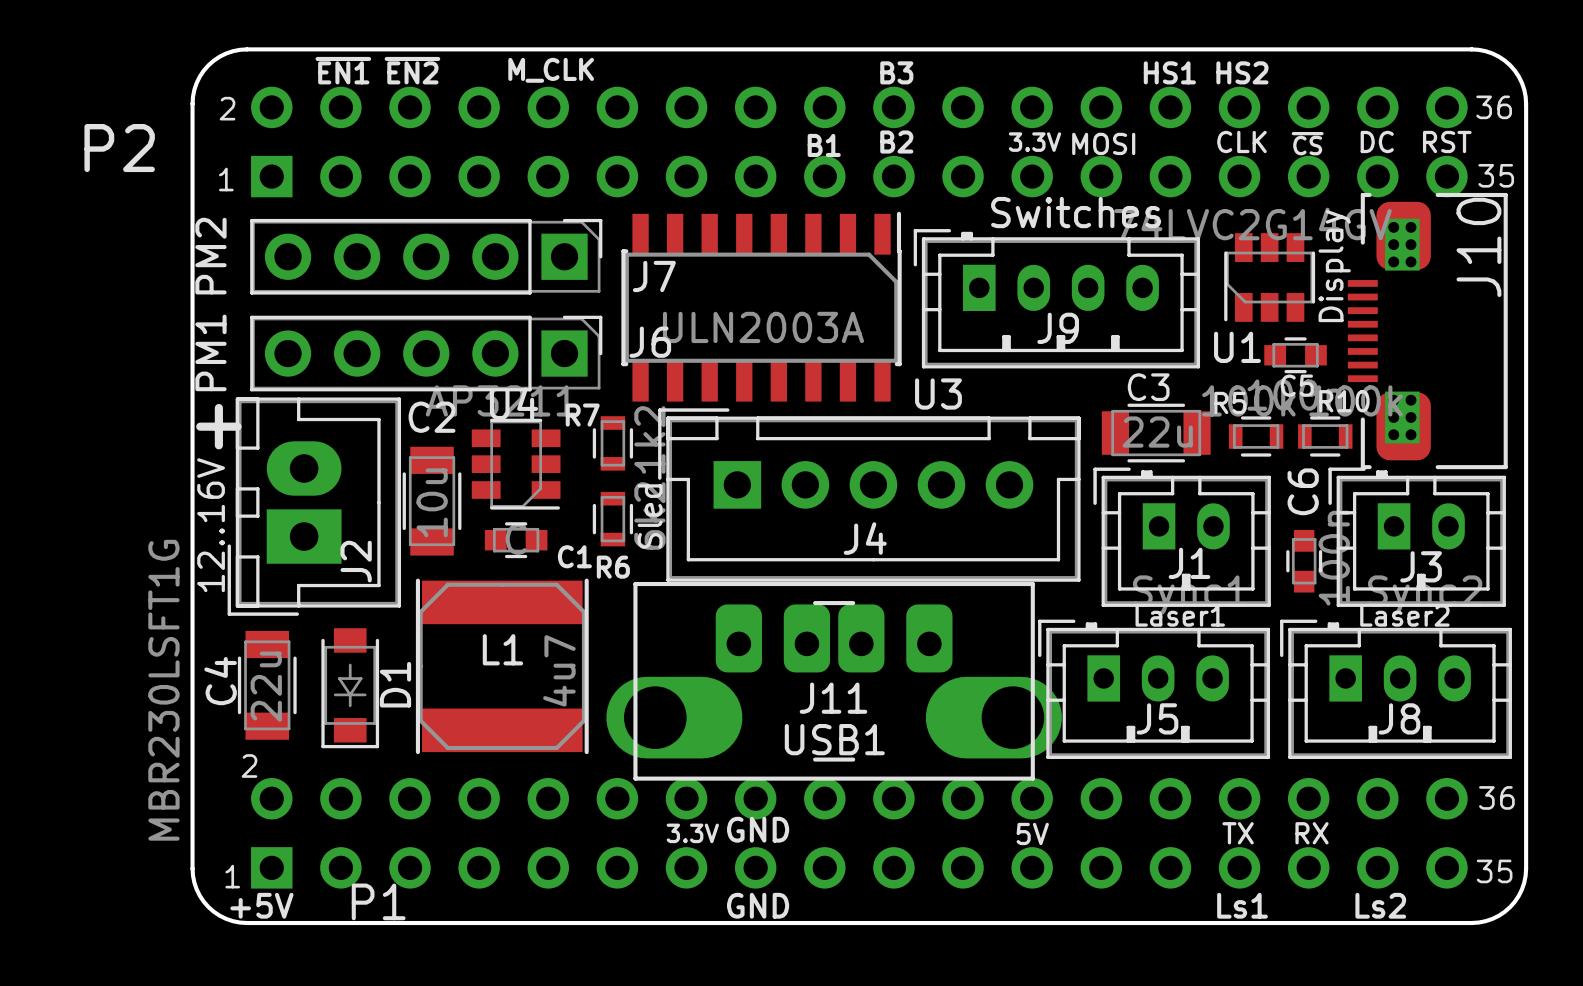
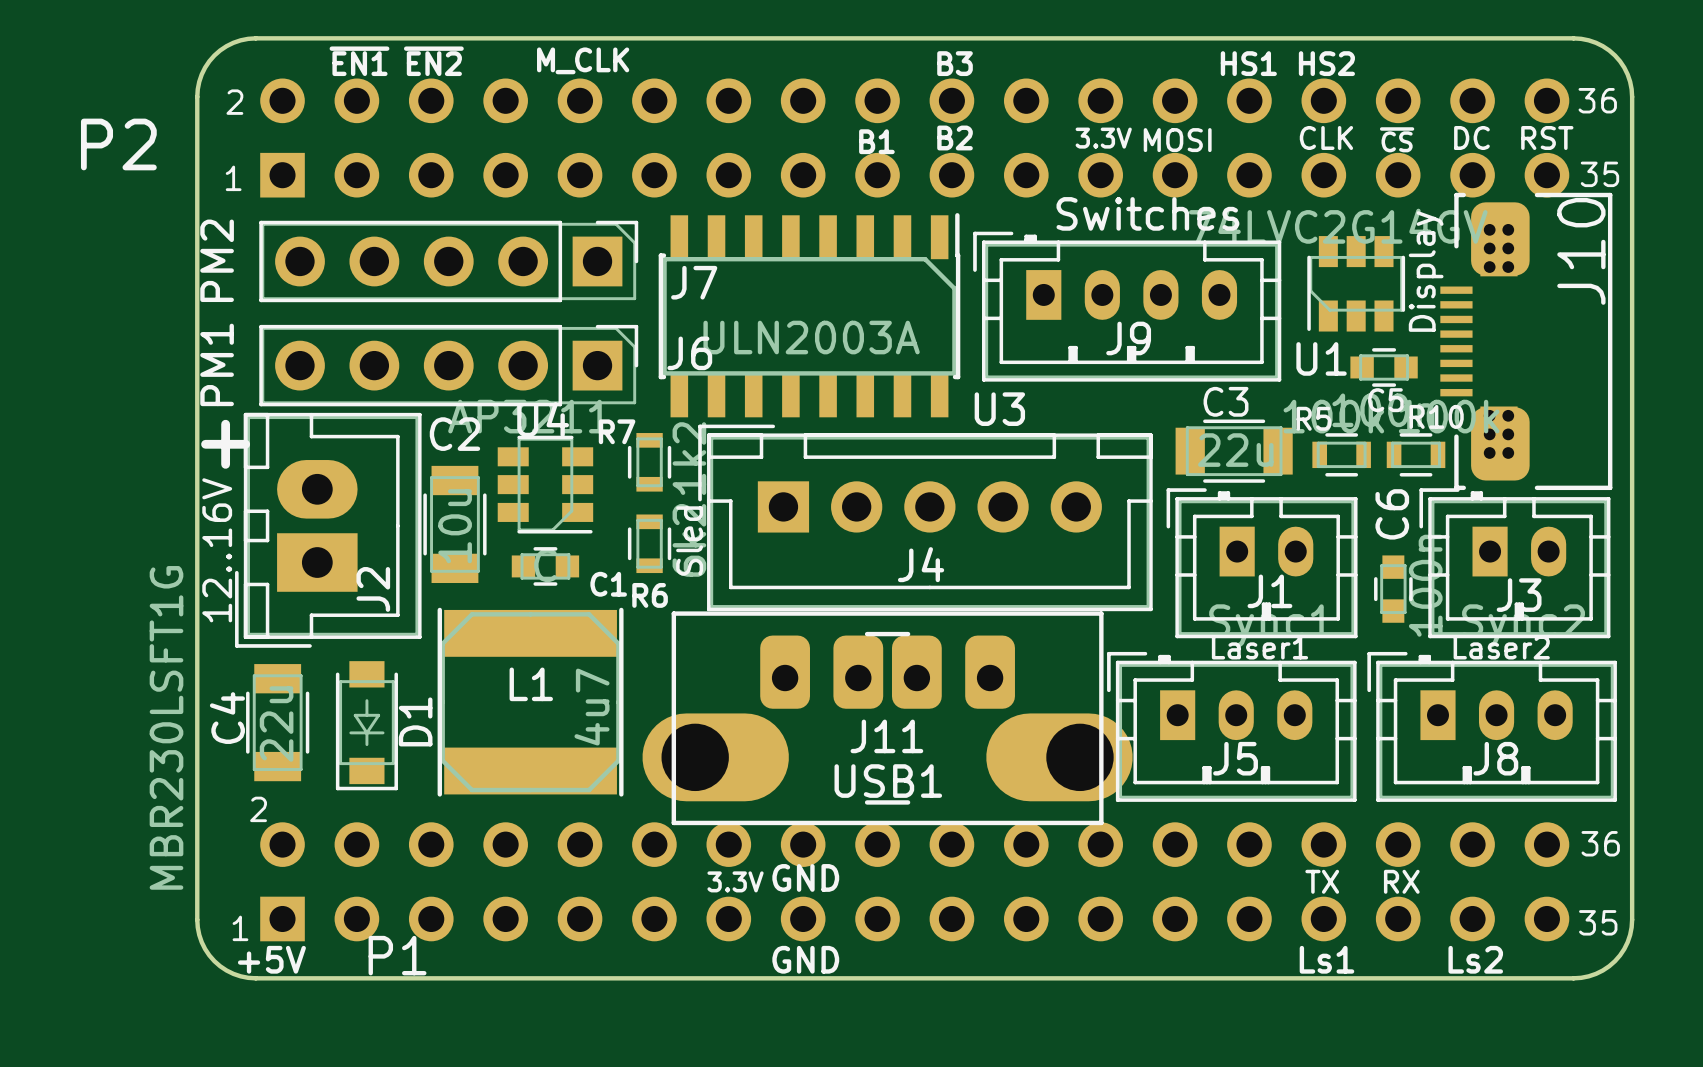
text: 5V (1032, 833) -> none

